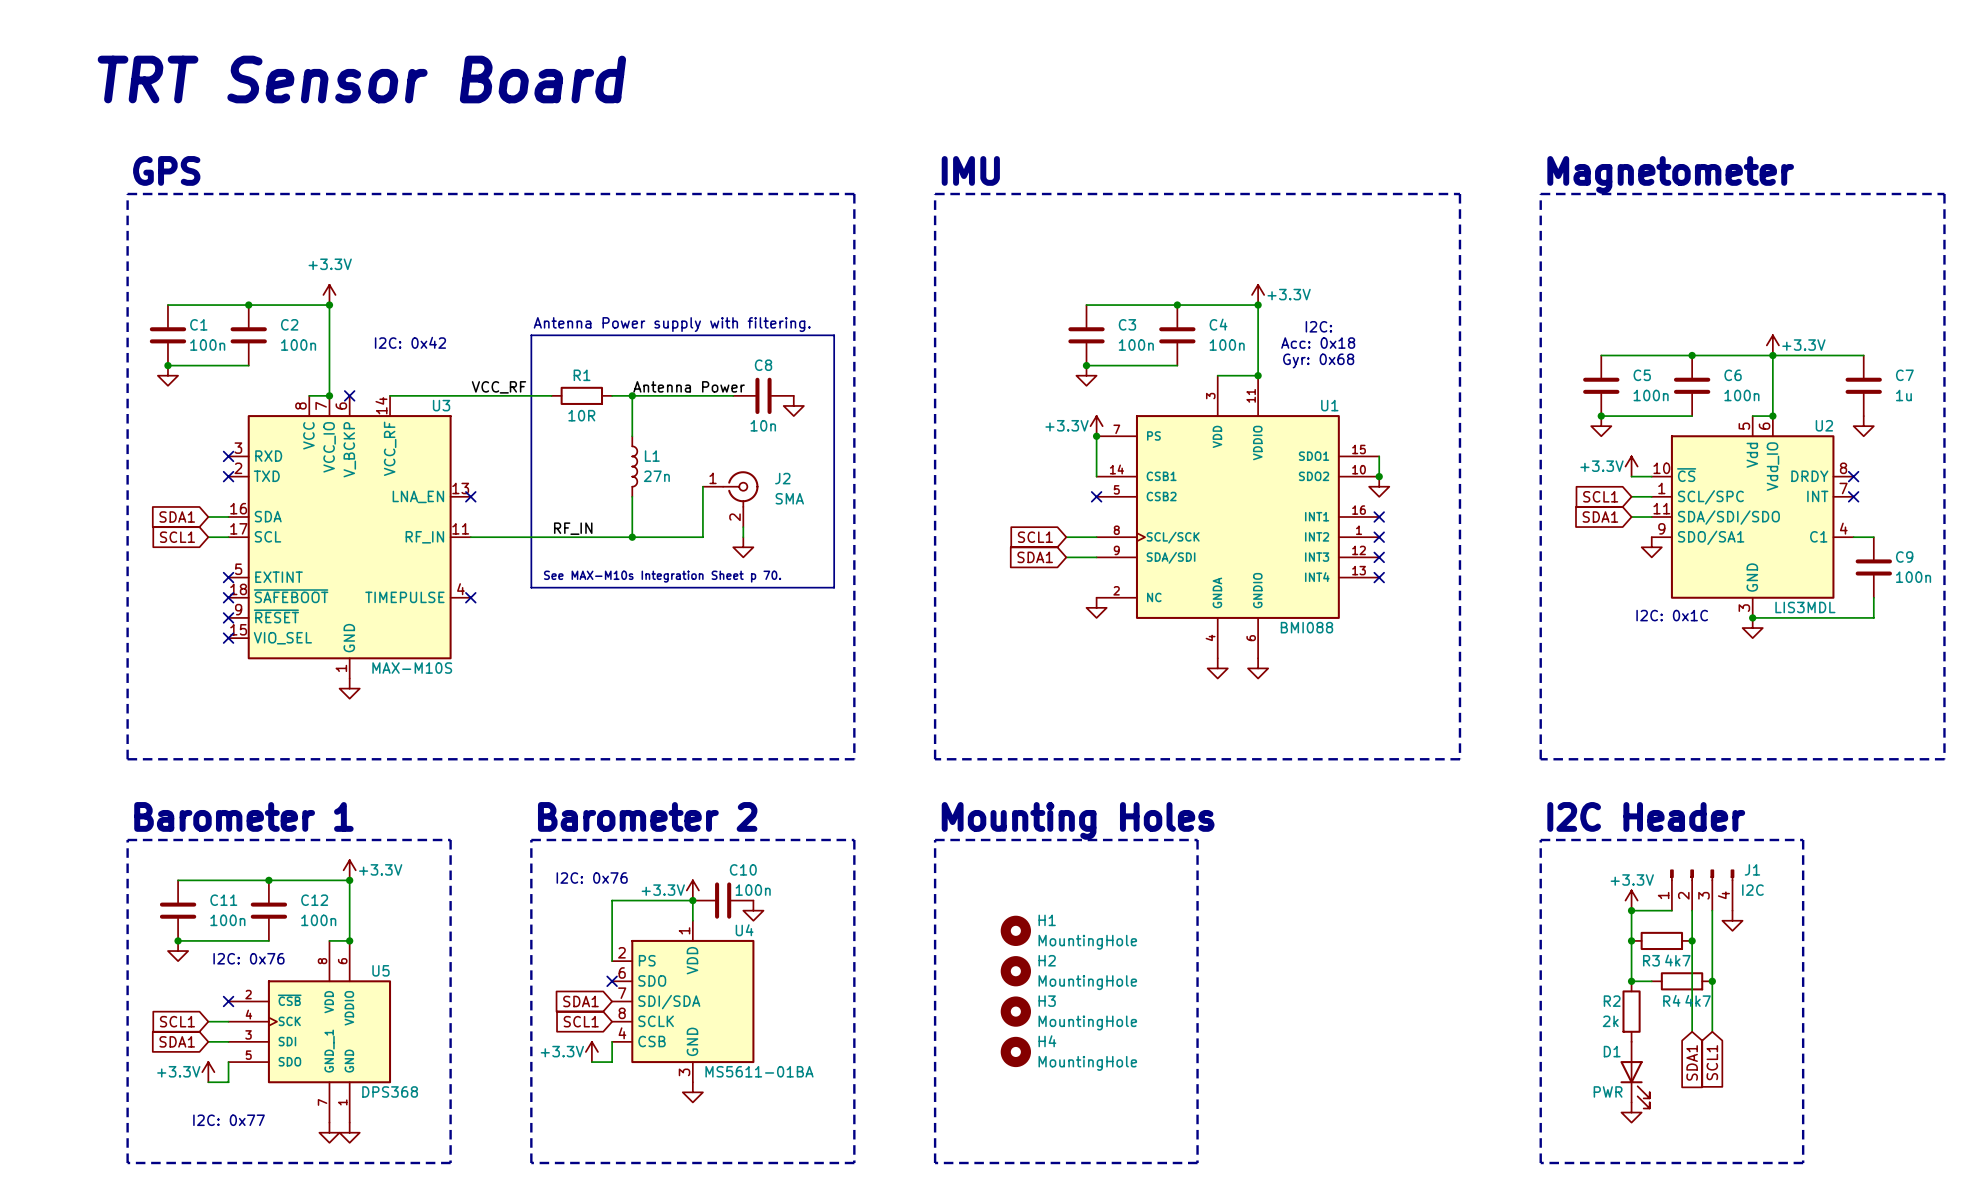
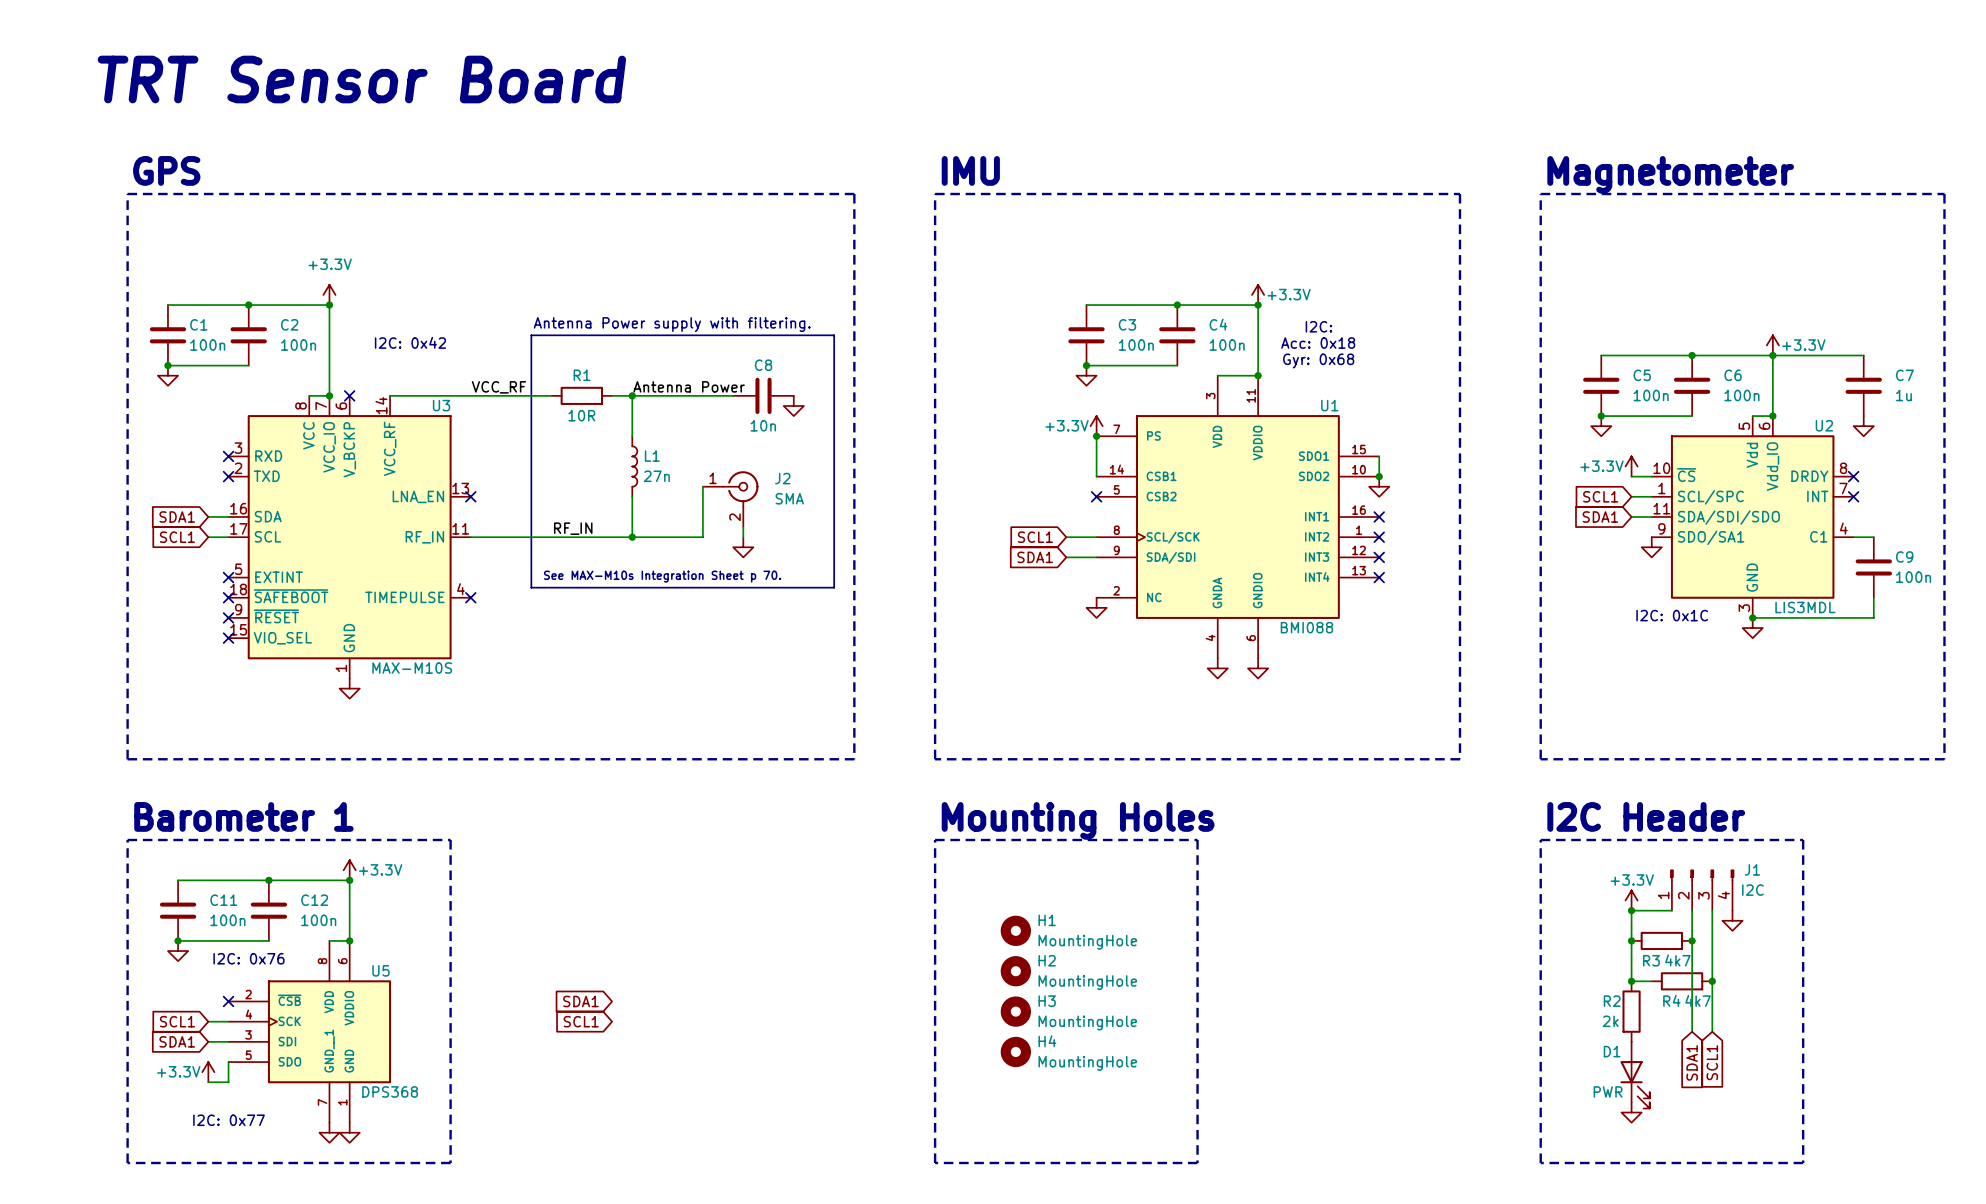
text: Barometer 2 (647, 816) -> none
line: (531, 840) (854, 840) (854, 1163) (531, 1163) (531, 840) -> none
text: I2C: 0x76 (592, 878) -> none
power symbol: +3.3V (692, 890) -> none
junction: (692, 900) -> none
C10: 100n (723, 900) -> none
power symbol: (753, 910) -> none
wire: (692, 920) (692, 900) (612, 900) (612, 961) -> none
no-connect mark: (612, 981) -> none
U4: MS5611-01BA (683, 1001) -> none
wire: (612, 1041) (612, 1062) (591, 1062) -> none
power symbol: +3.3V (591, 1051) -> none
power symbol: (692, 1092) -> none

